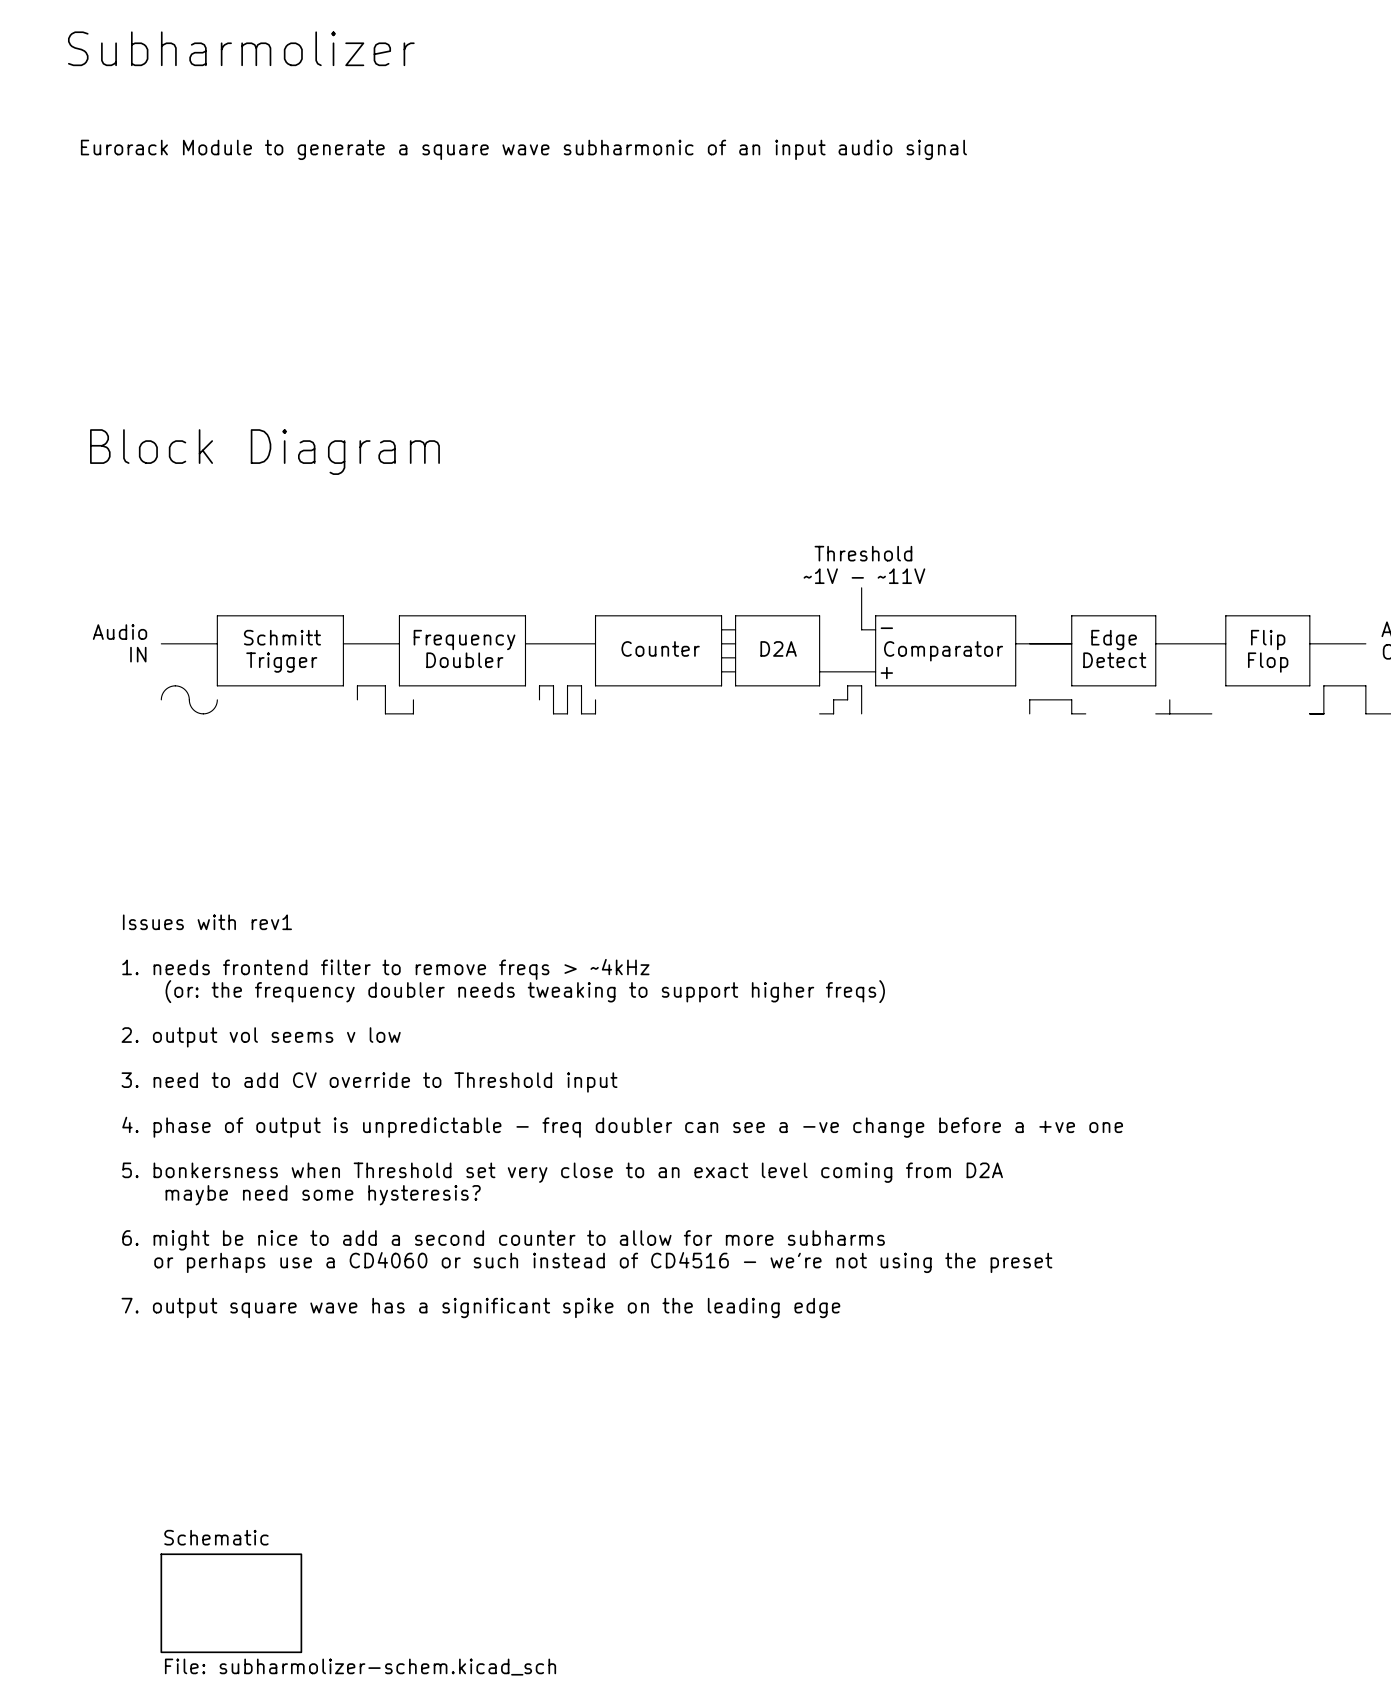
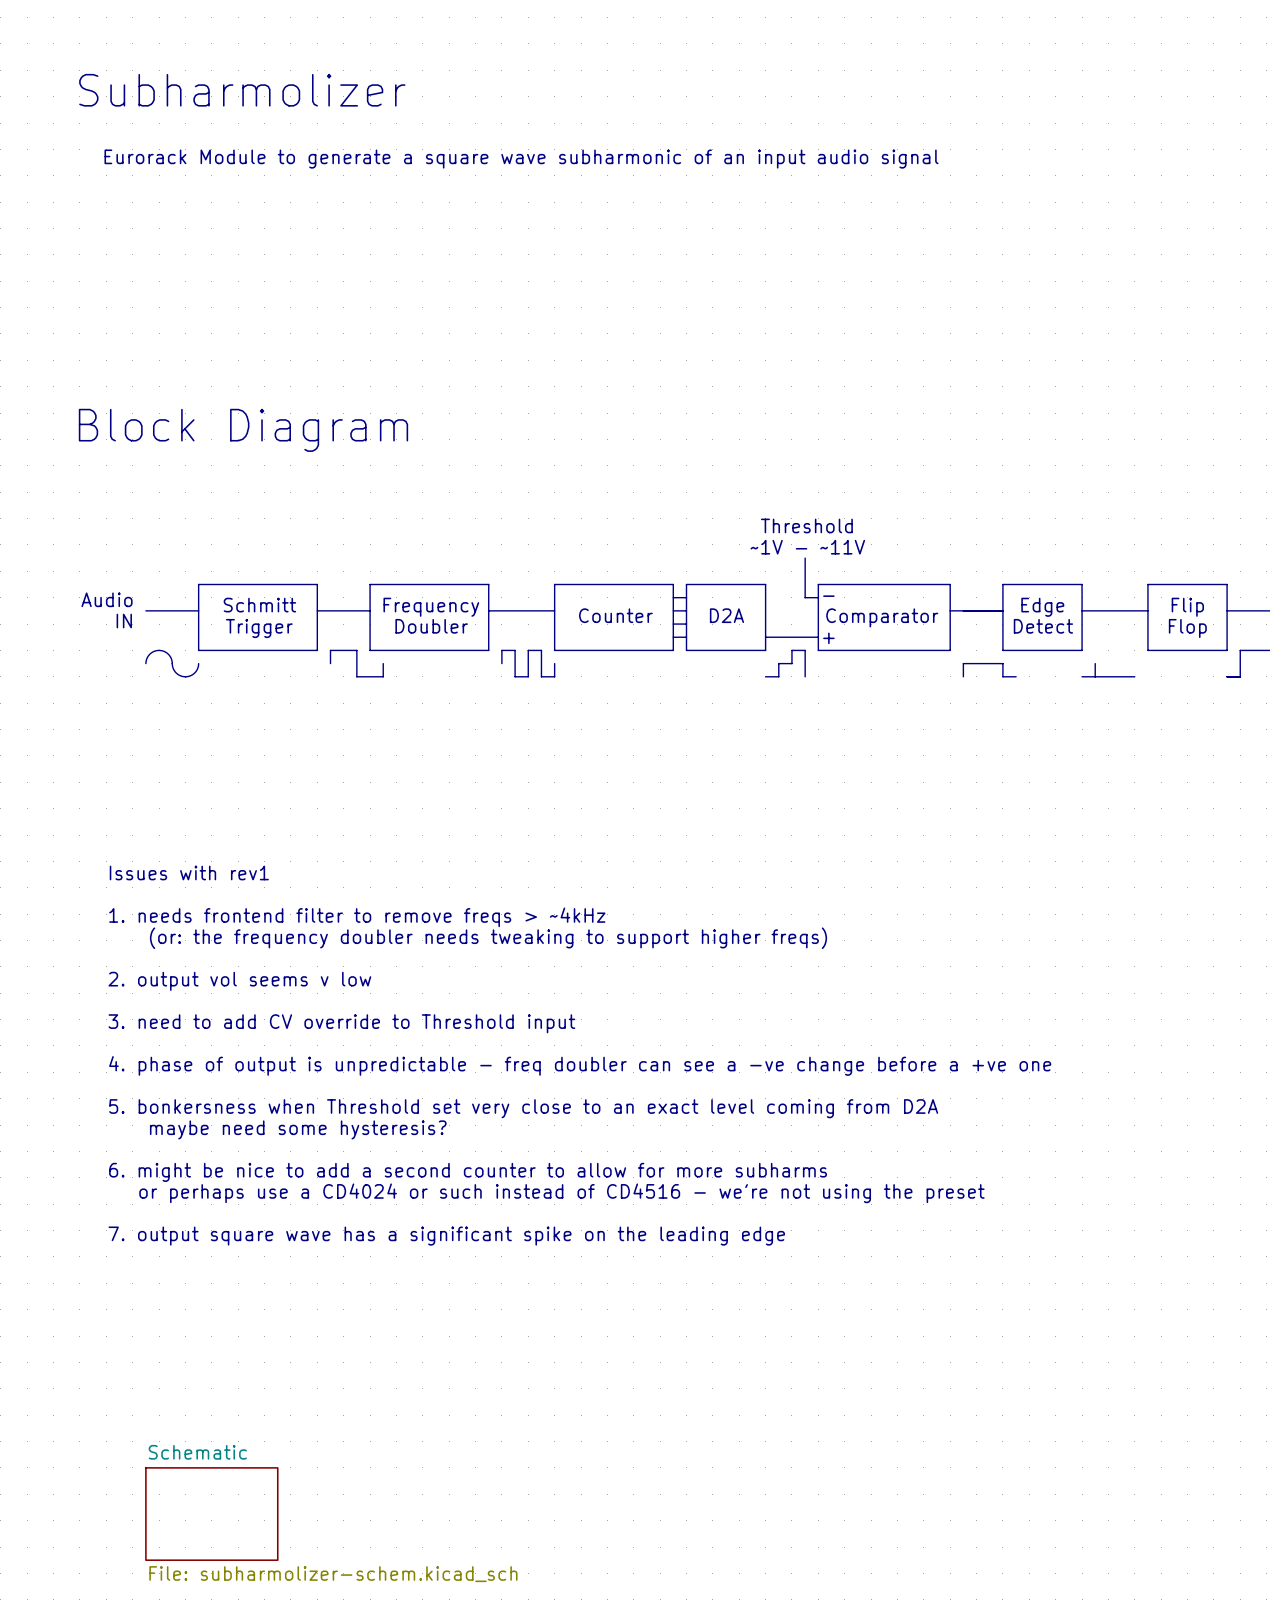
text position: Subharmolizer (241, 48) -> Subharmolizer (242, 90)
text position: Eurorack Module to generate a square wave subharmonic of an input audio signal (523, 149) -> Eurorack Module to generate a square wave subharmonic of an input audio signal (521, 159)
text: or perhaps use a CD4060 or such instead of CD4516 - we're not using the preset (603, 1262) -> or perhaps use a CD4024 or such instead of CD4516 - we're not using the preset (561, 1193)

